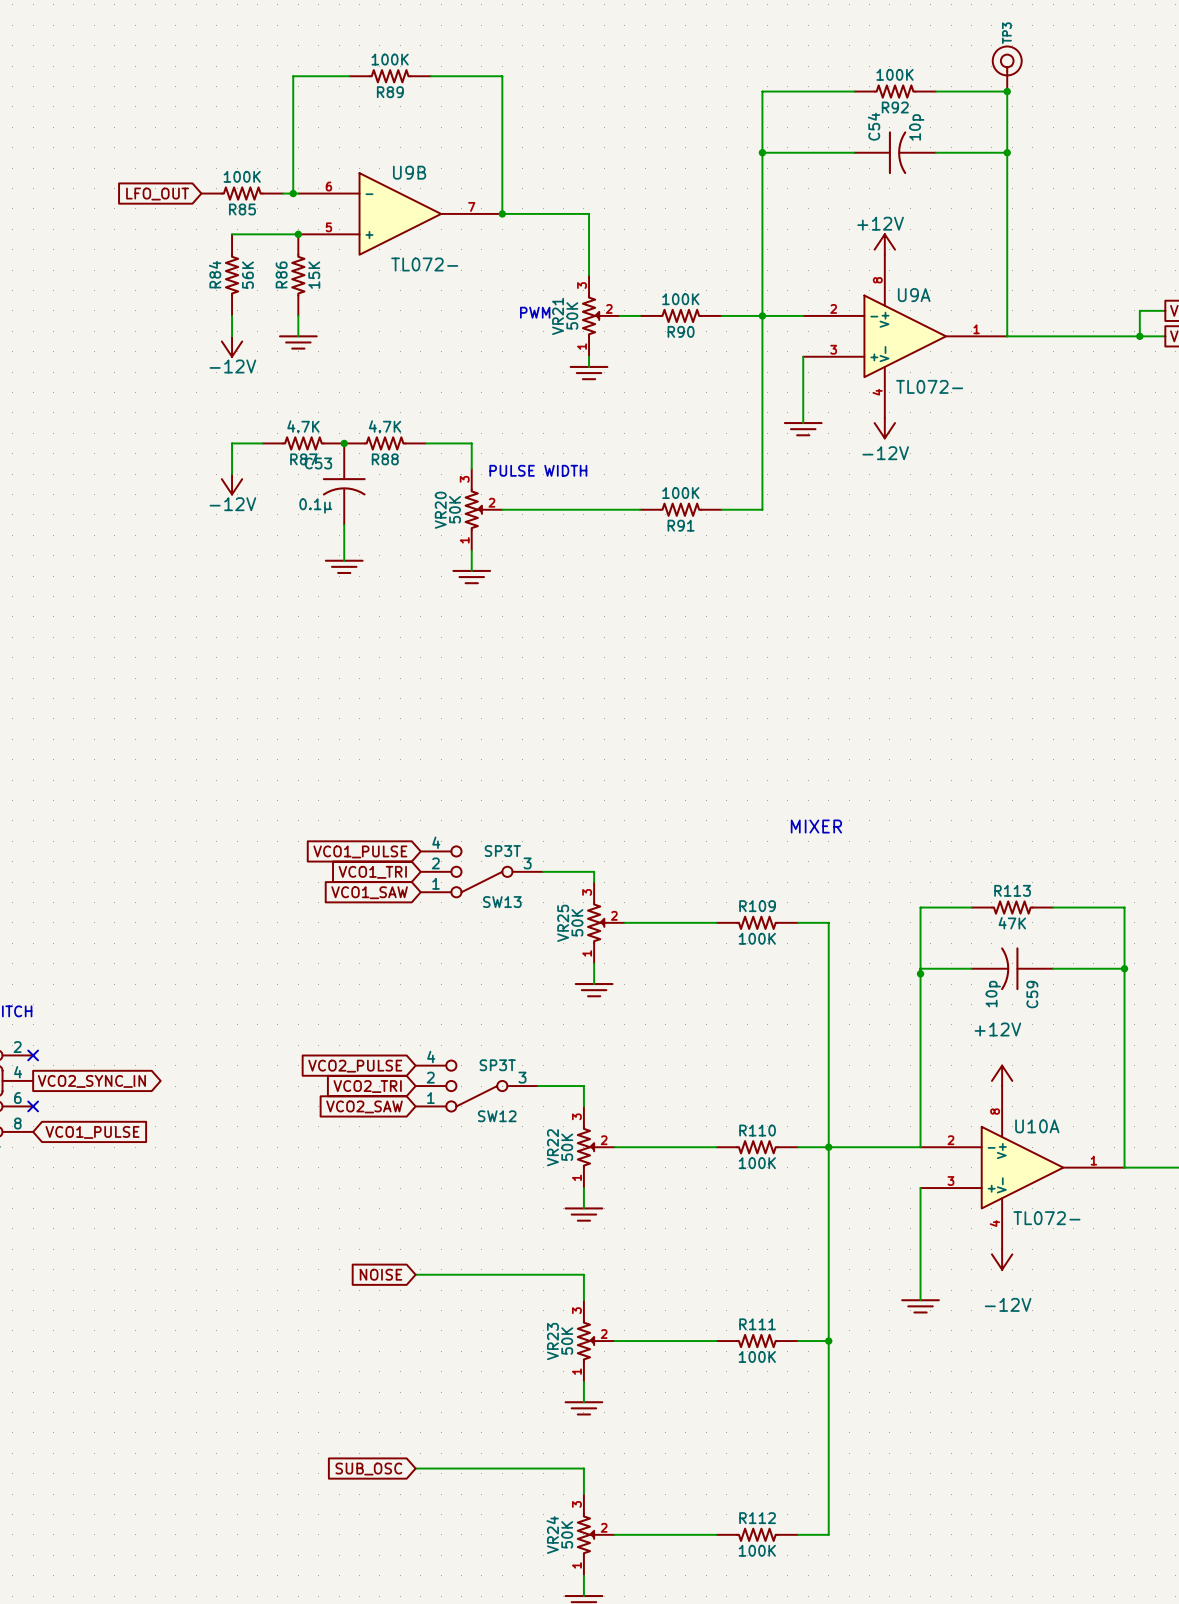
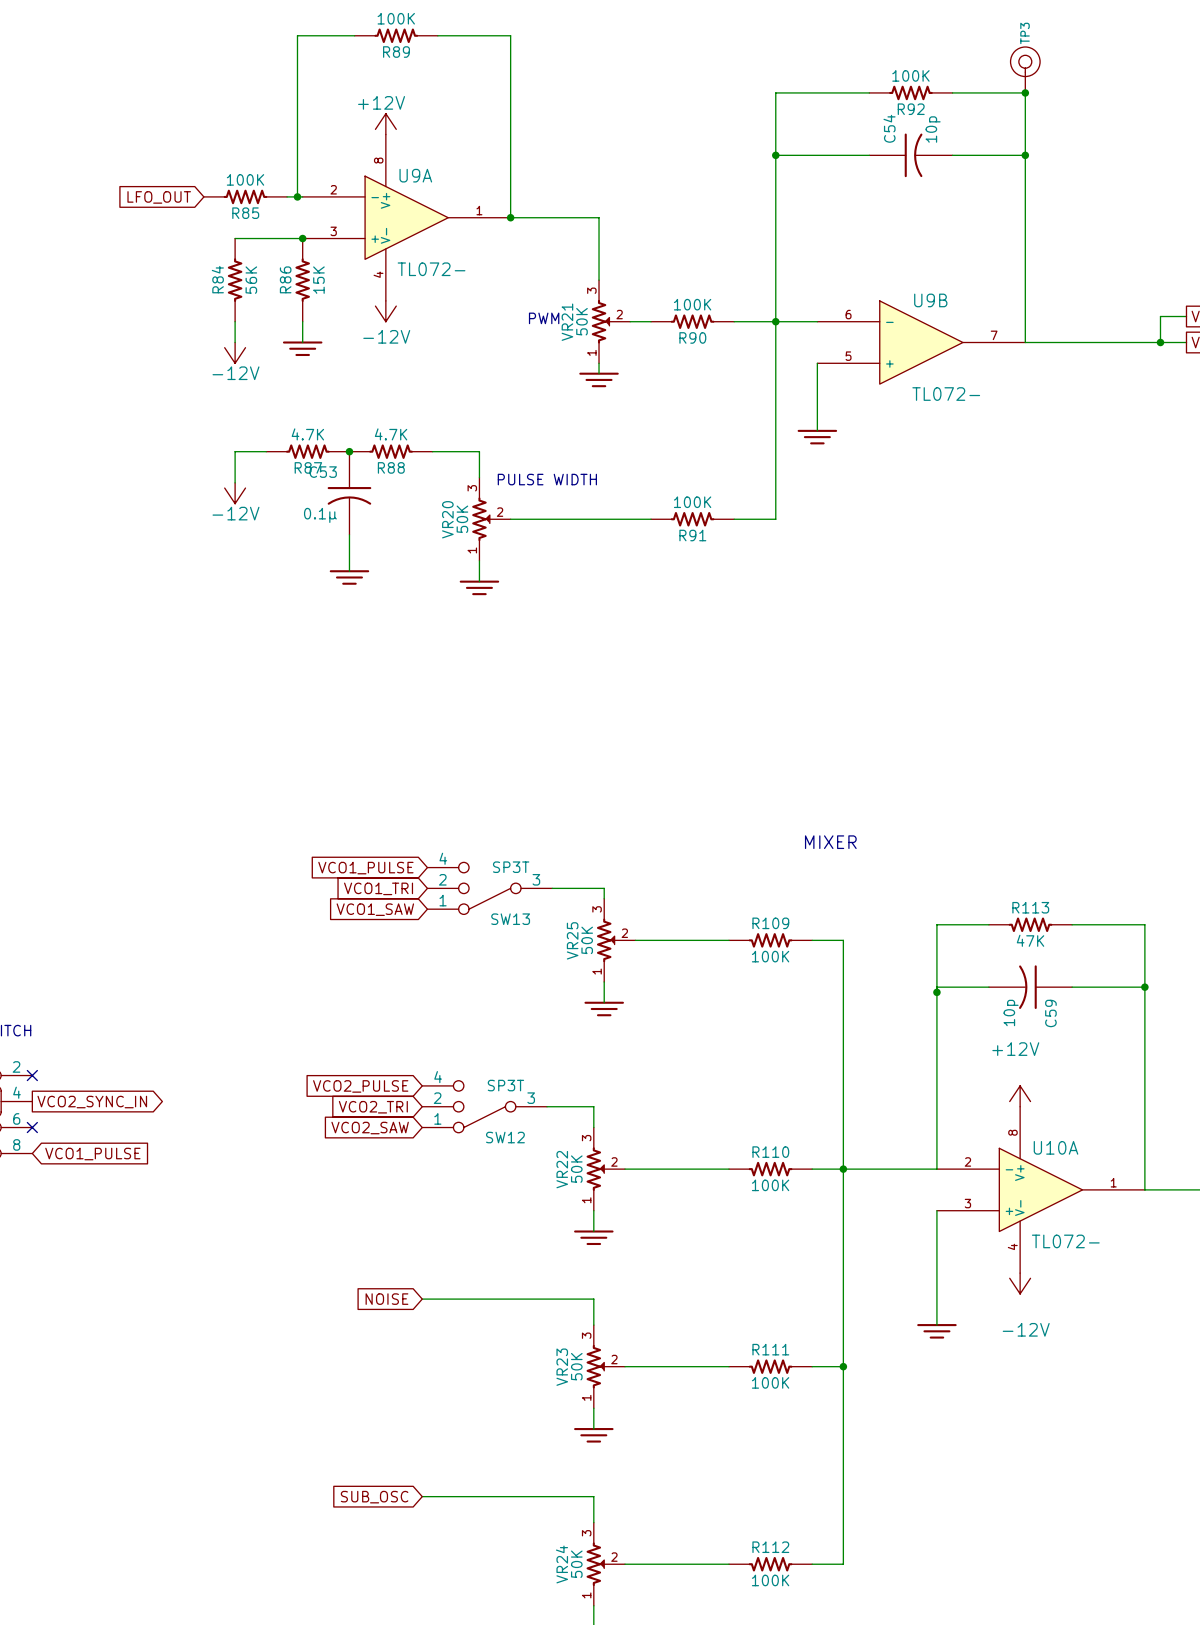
wire: (293, 76) (349, 76) -> (297, 77) (297, 35) (354, 35)
R89 position: (390, 76) -> (396, 35)
wire: (430, 76) (502, 76) -> (437, 35) (510, 35) (510, 77)
power symbol: none -> +12V (385, 124)
U9B position: (400, 213) -> (921, 342)
power symbol: +12V (884, 244) -> none
power symbol: none -> -12V (385, 311)
U9A position: (905, 336) -> (406, 217)
power symbol: -12V (884, 428) -> none

